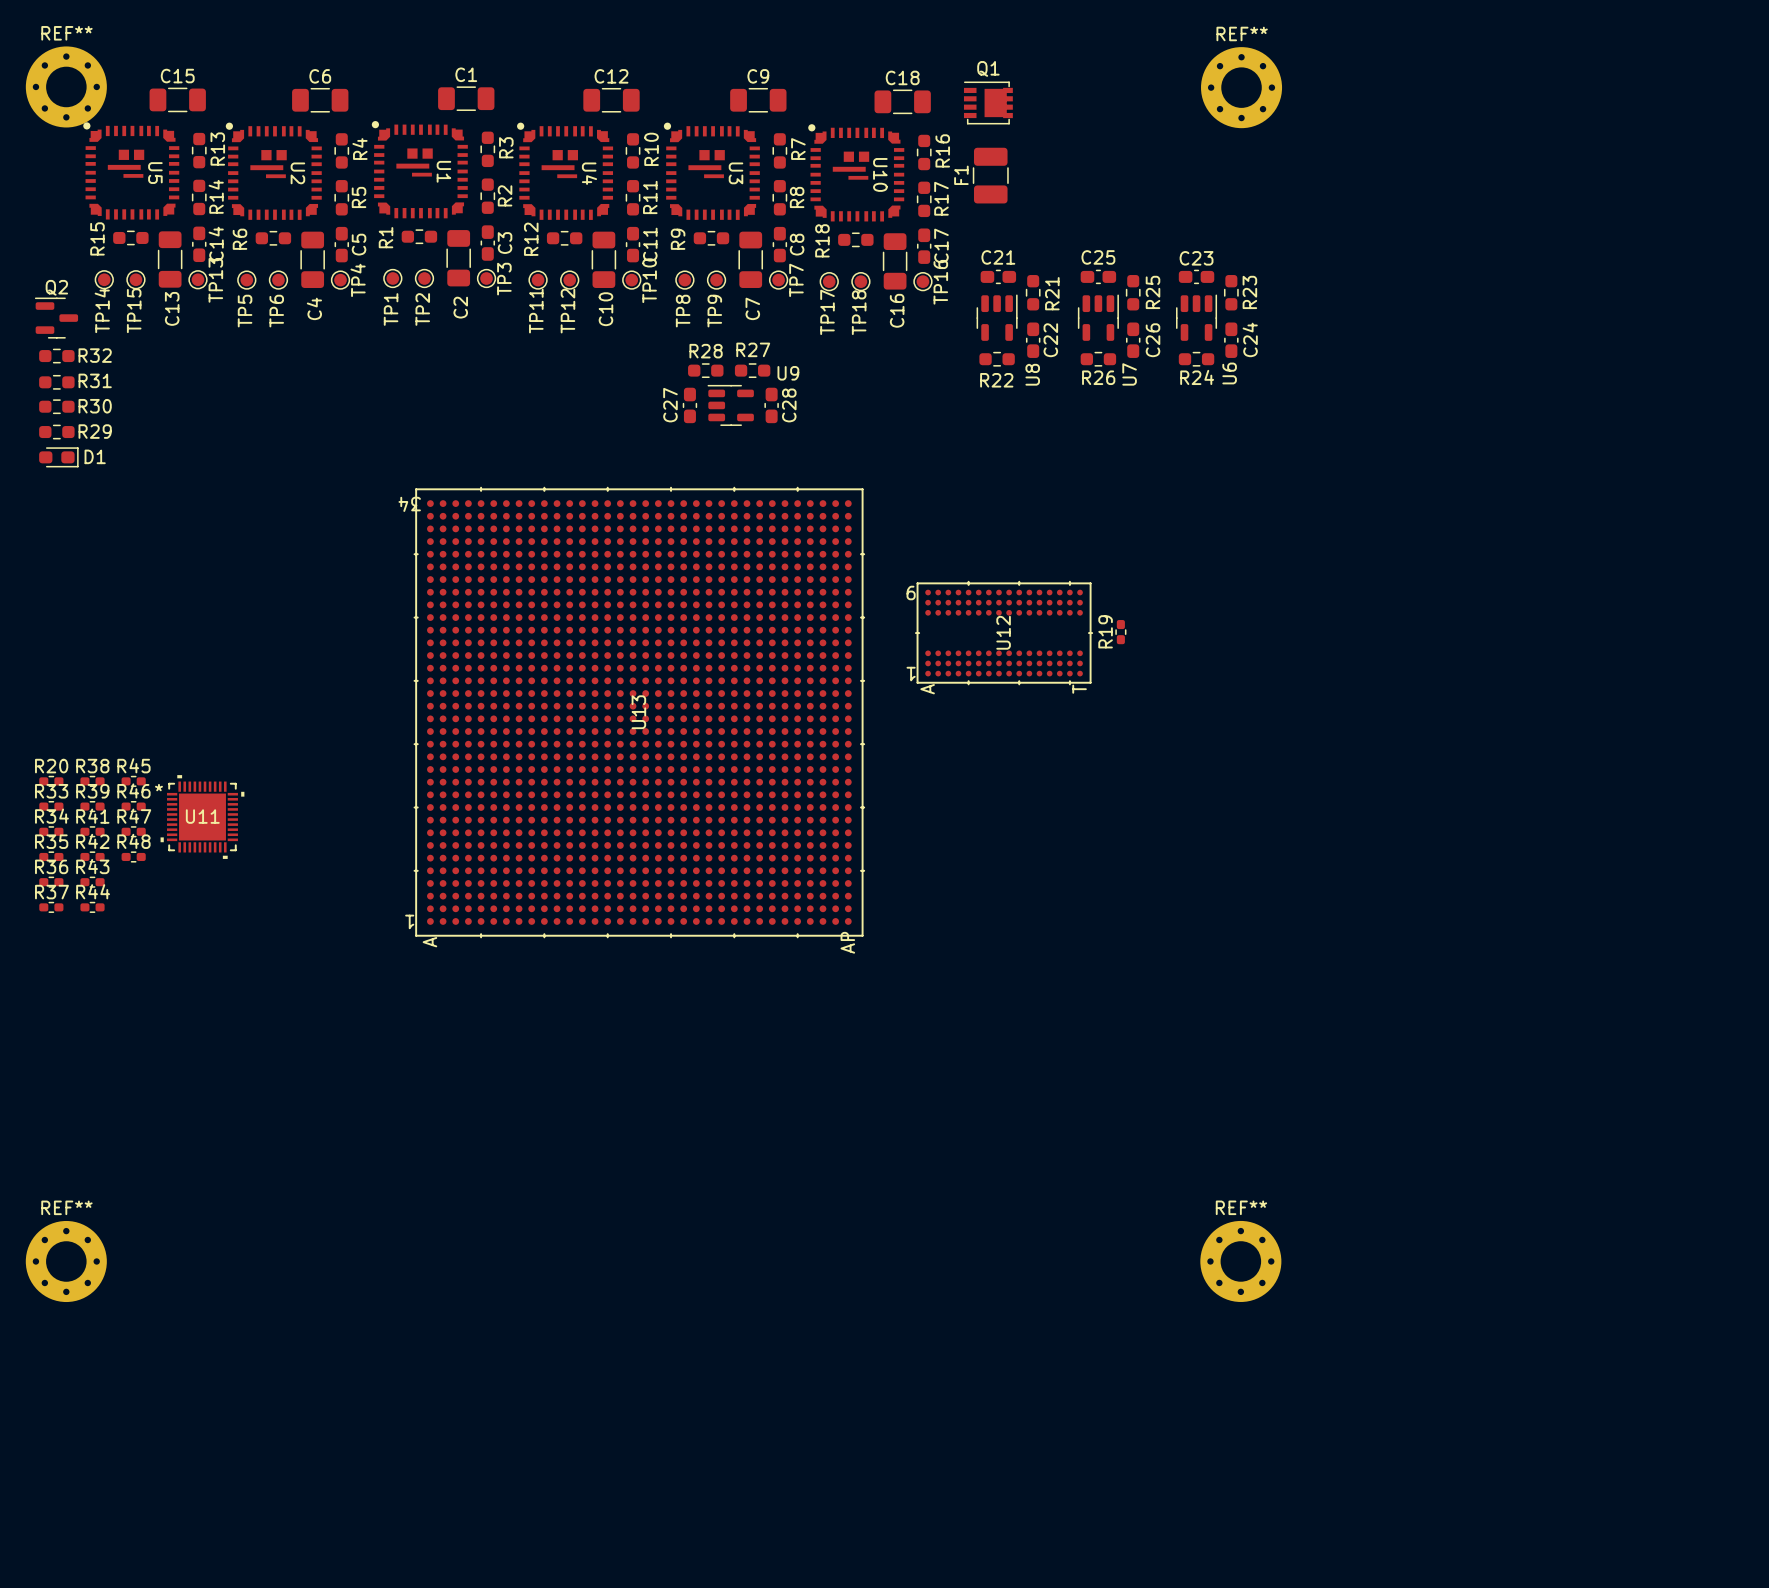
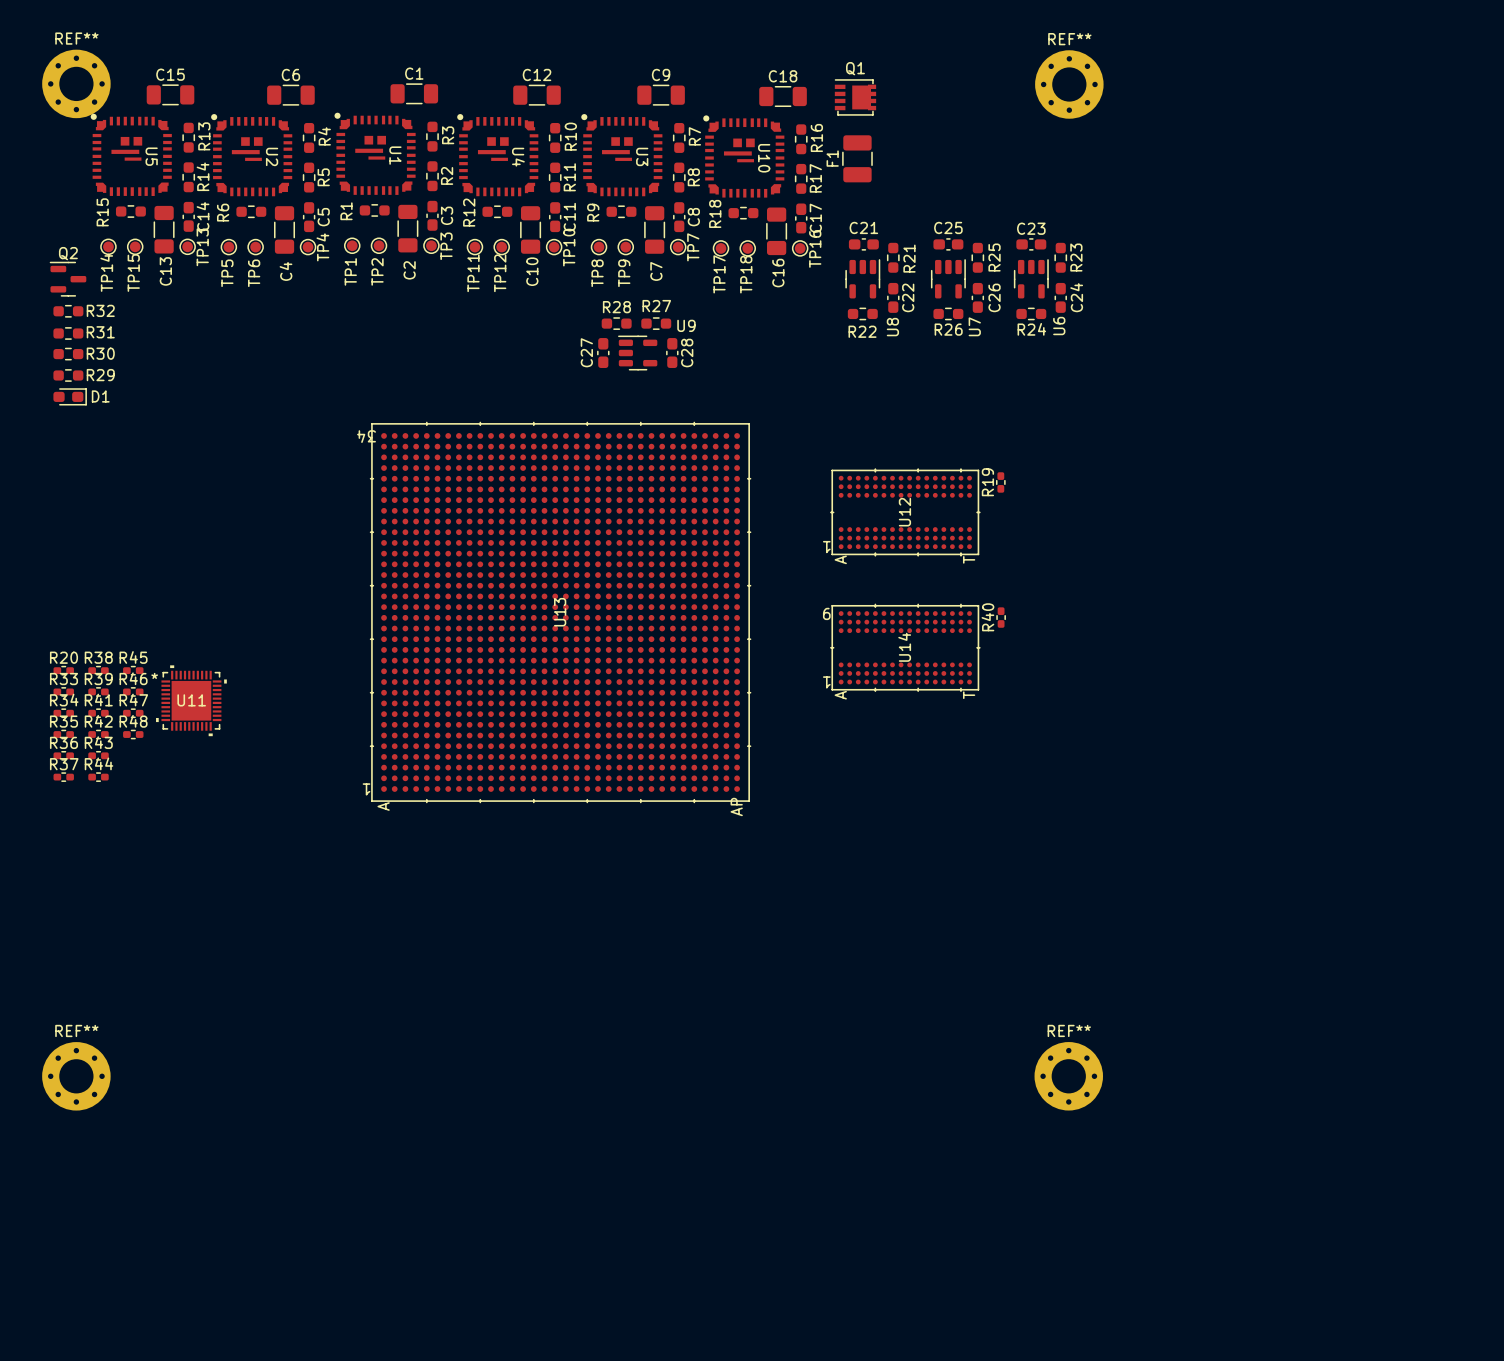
U12 text: 9 (911, 593) -> none
R19 position: (1120, 632) -> (1000, 482)
U12 position: (1004, 633) -> (905, 512)
R40: none -> (1001, 617)
U14: none -> (905, 647)

